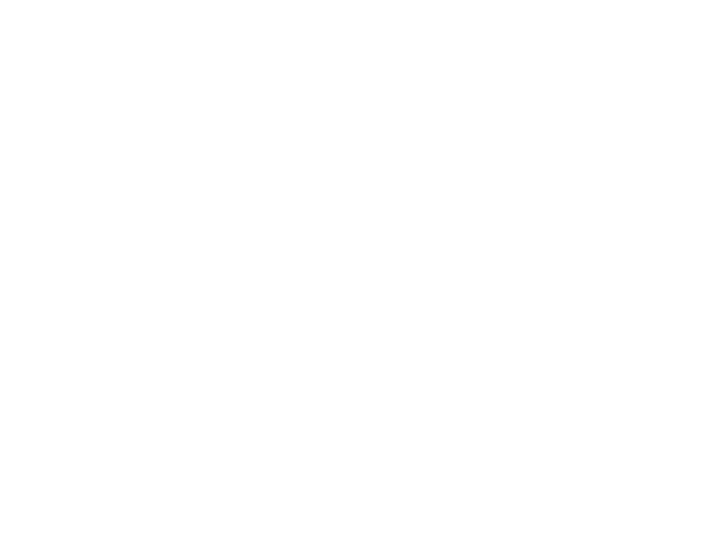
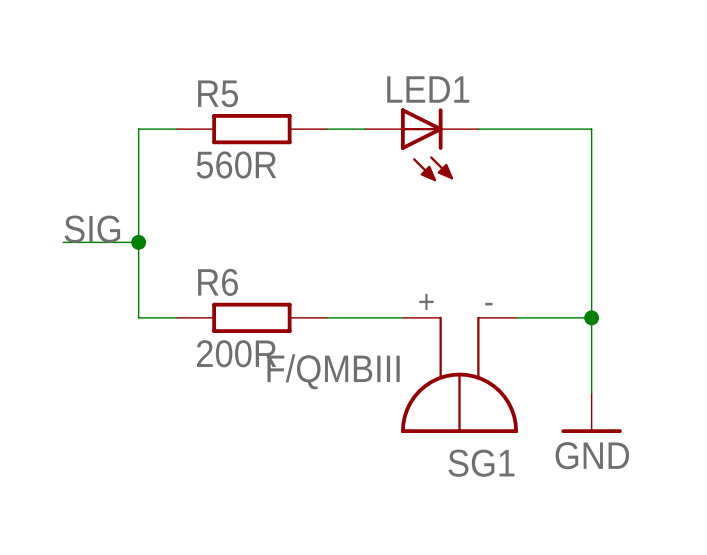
wire: none -> (176, 129) (138, 129) (138, 317) (176, 317)
R5: none -> 560R (251, 129)
wire: none -> (327, 129) (365, 129)
wire: none -> (478, 129) (591, 129) (591, 393)
LED1: none -> (421, 144)
label: none -> SIG (92, 229)
wire: none -> (63, 242) (138, 242)
junction: none -> (138, 242)
R6: none -> 200R (251, 317)
wire: none -> (327, 317) (402, 317)
wire: none -> (516, 317) (591, 317)
junction: none -> (591, 317)
SG1: none -> F/QMBIII (459, 374)
power symbol: none -> GND (591, 413)

